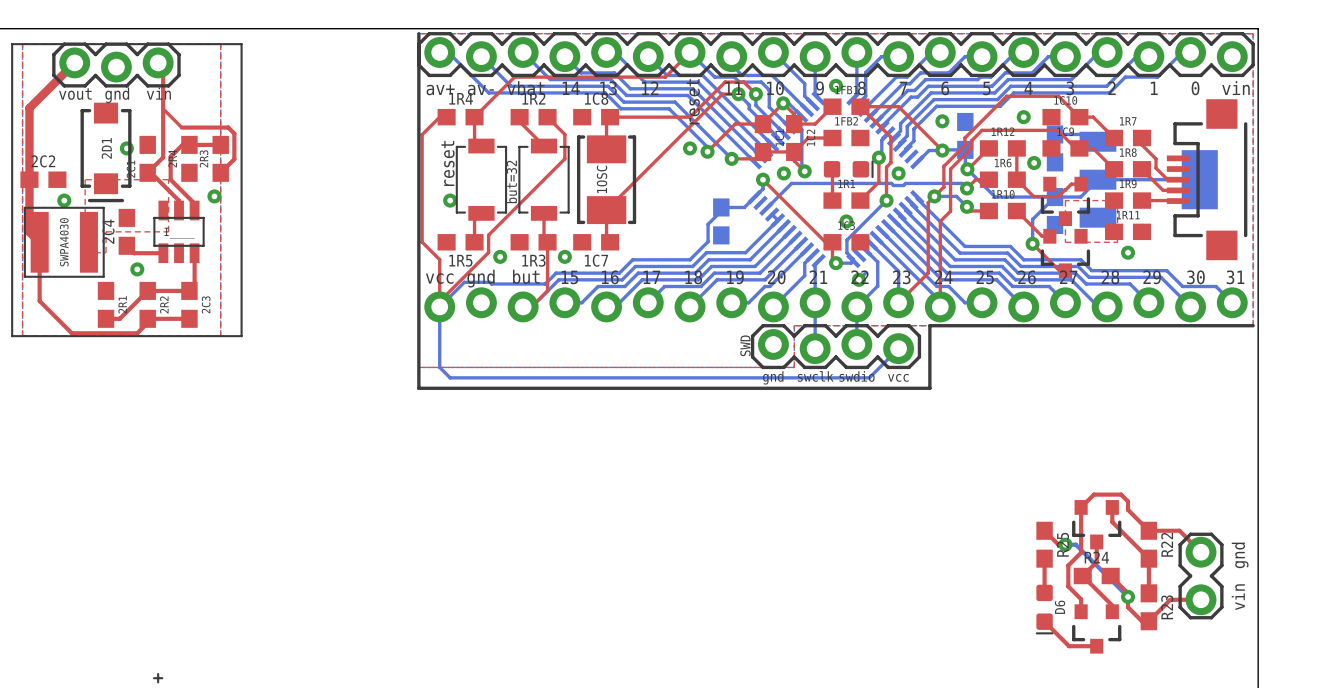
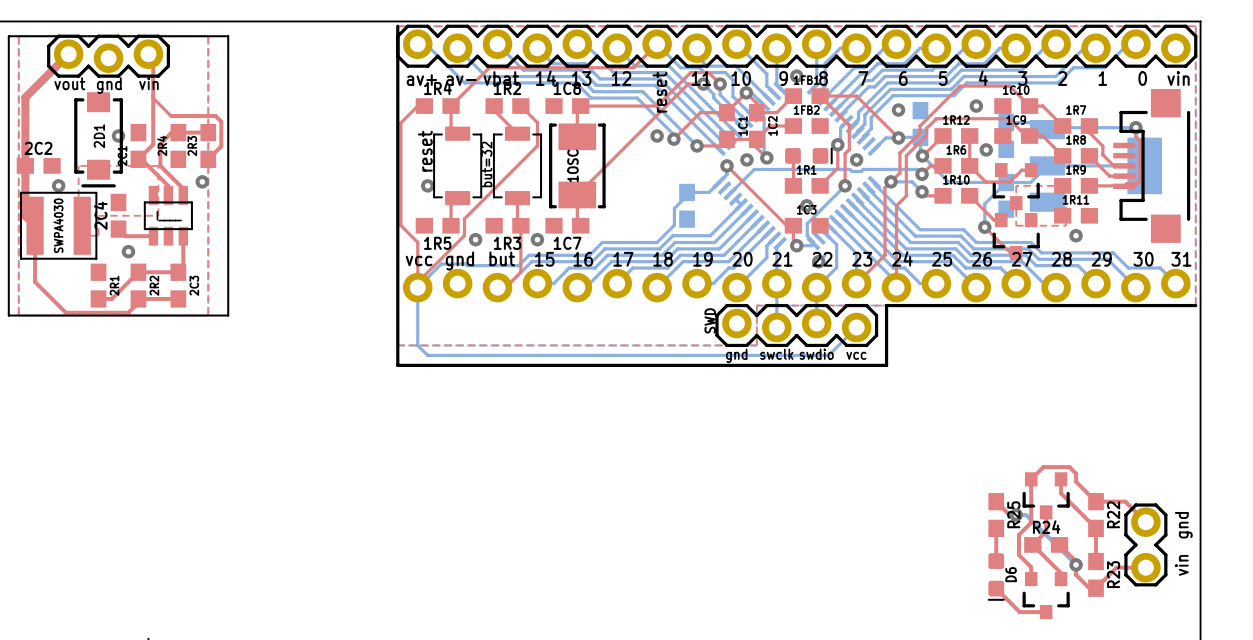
top track: none -> (1135, 127) (1135, 136) (1139, 140) (1139, 180) (1137, 183) (1126, 183) (1124, 186)
bottom track: none -> (1135, 127) (1049, 127) (1047, 129)
via: none -> (1135, 127)

